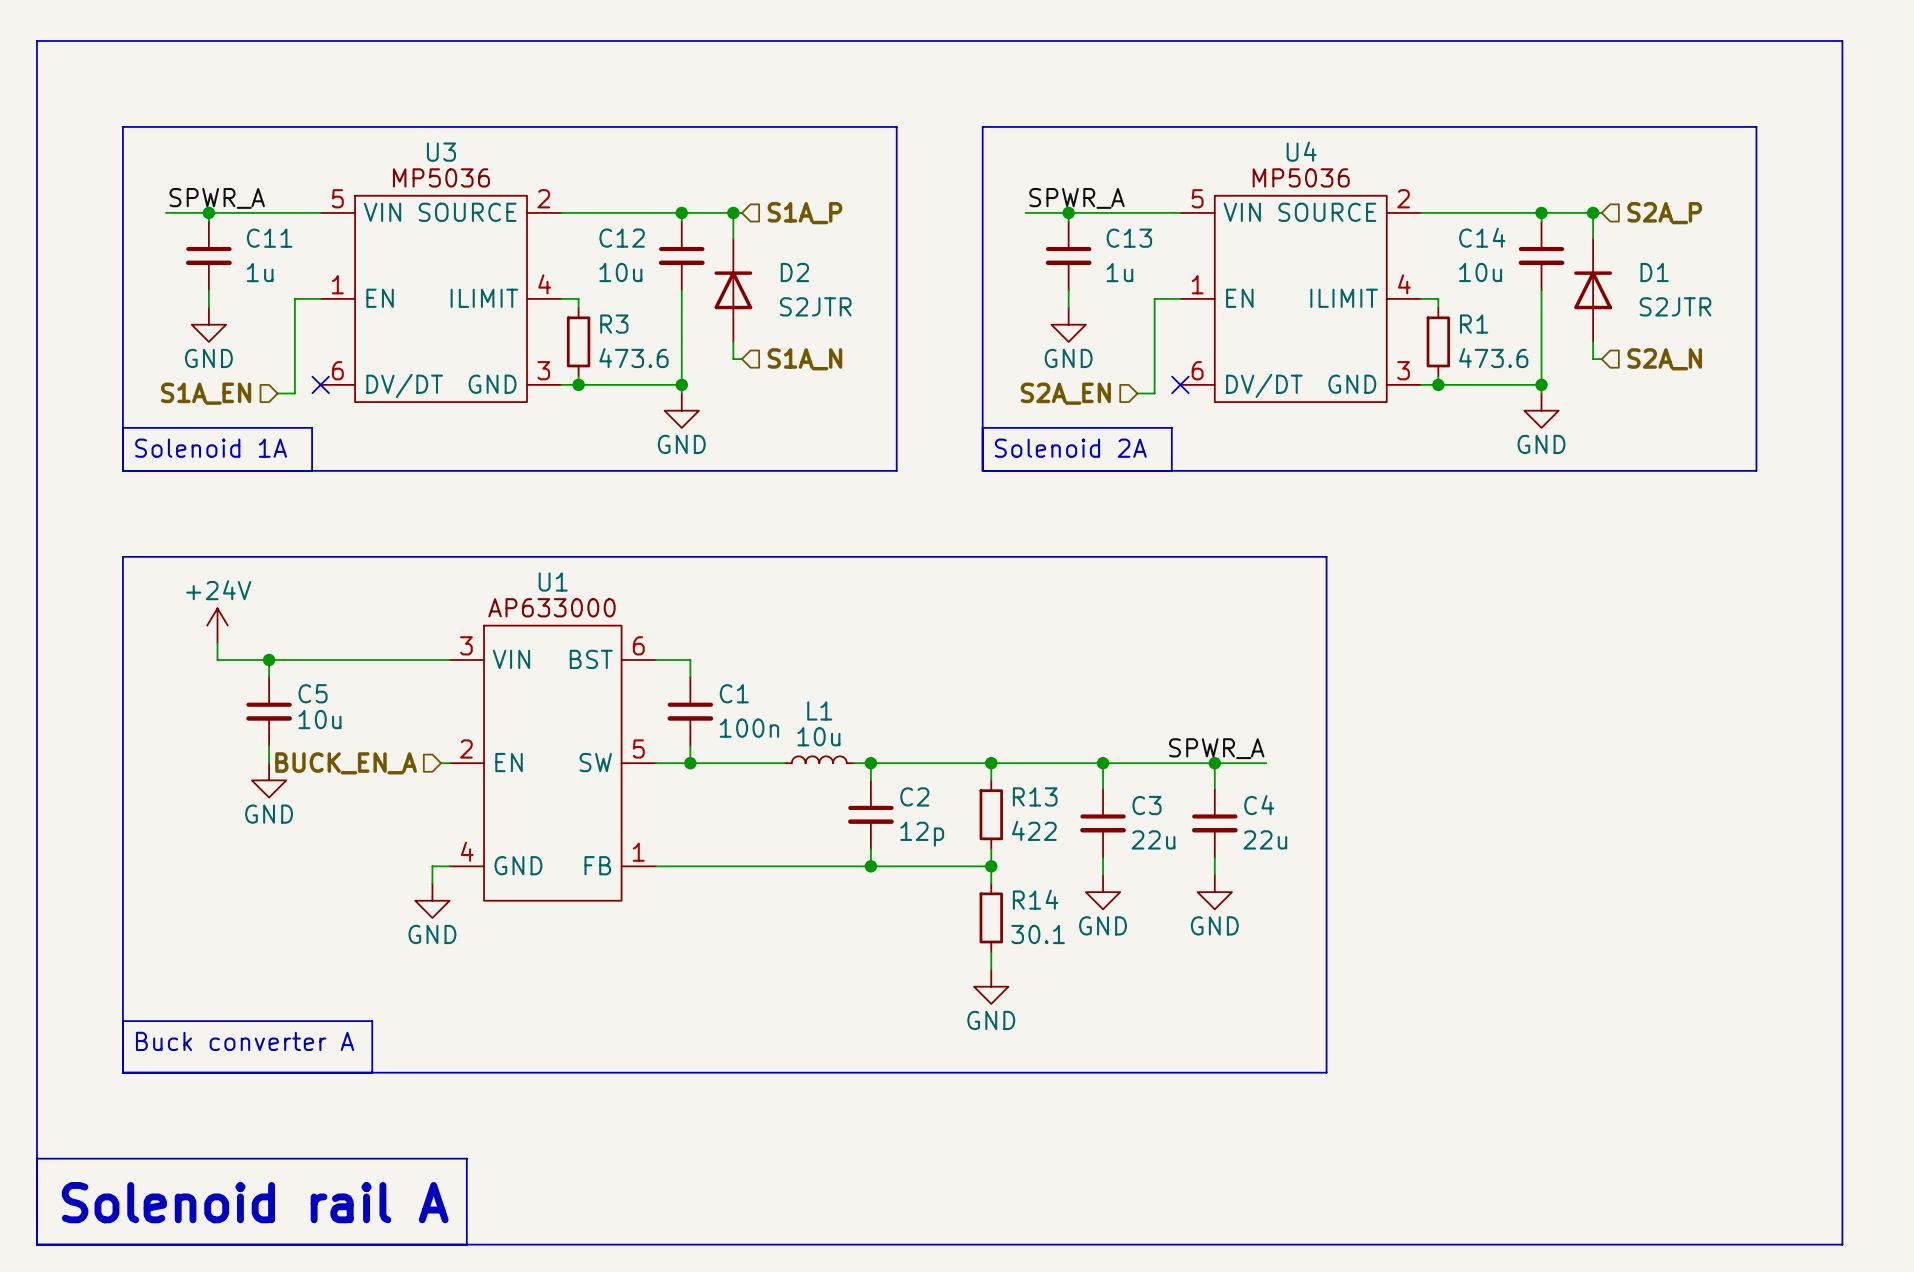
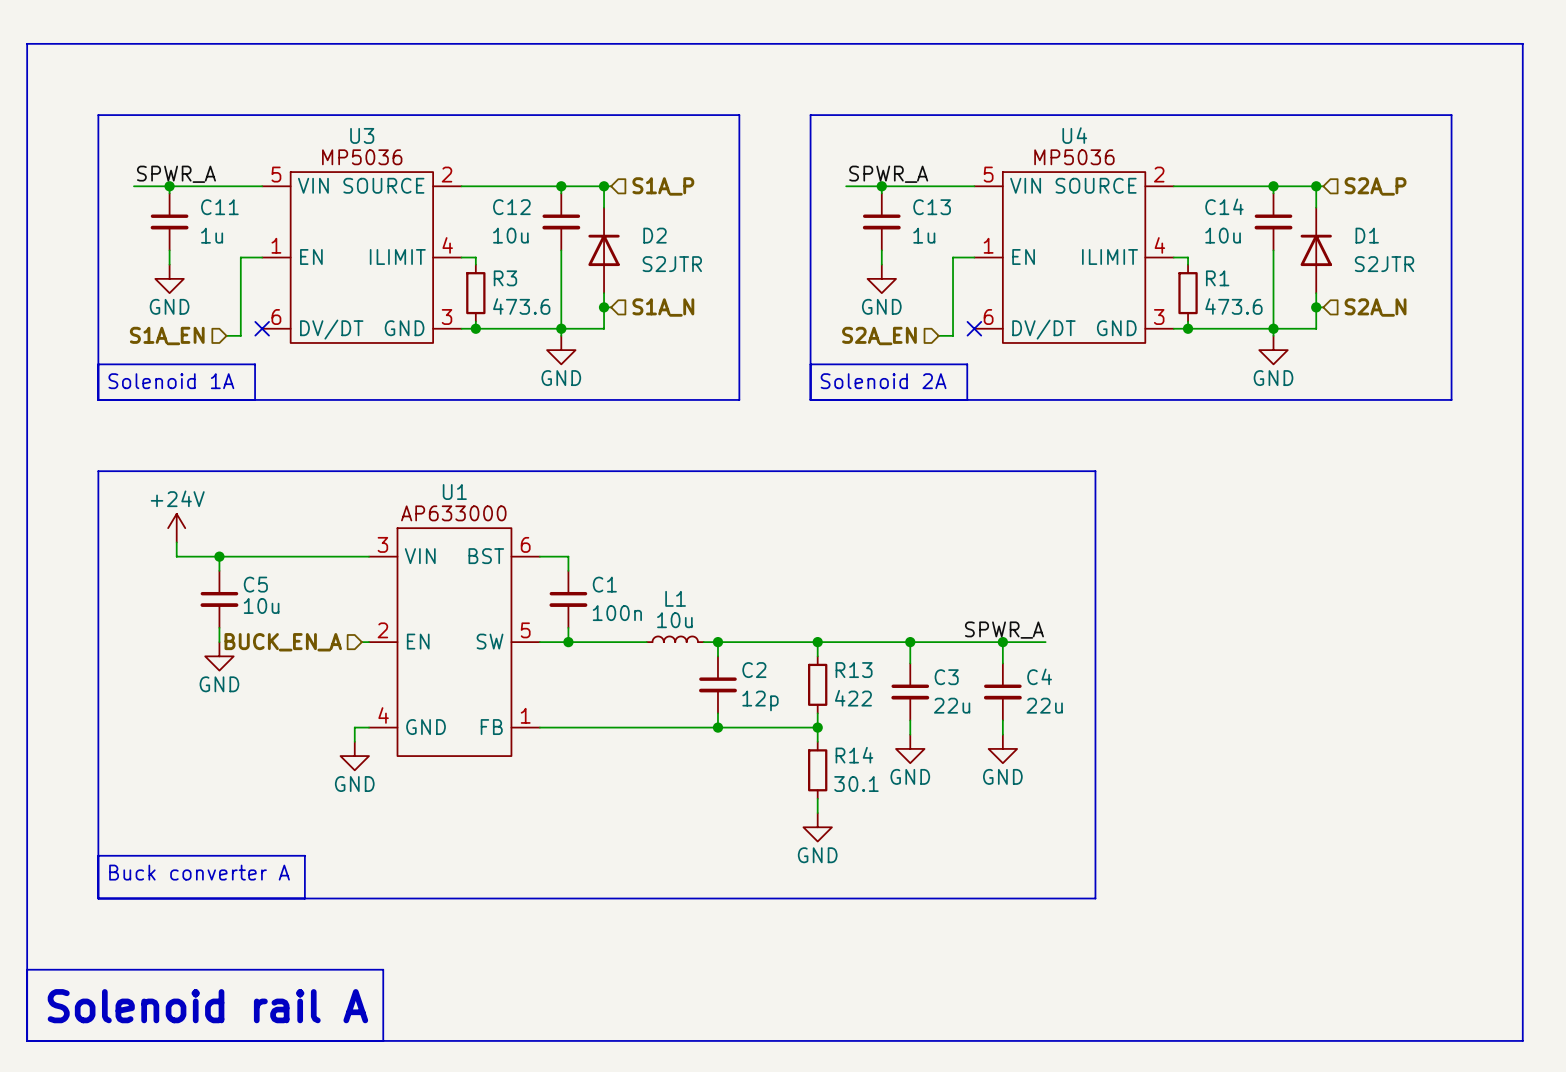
wire: none -> (604, 307) (604, 328) (561, 328)
junction: none -> (604, 307)
wire: none -> (1316, 307) (1316, 328) (1273, 328)
junction: none -> (1316, 307)

